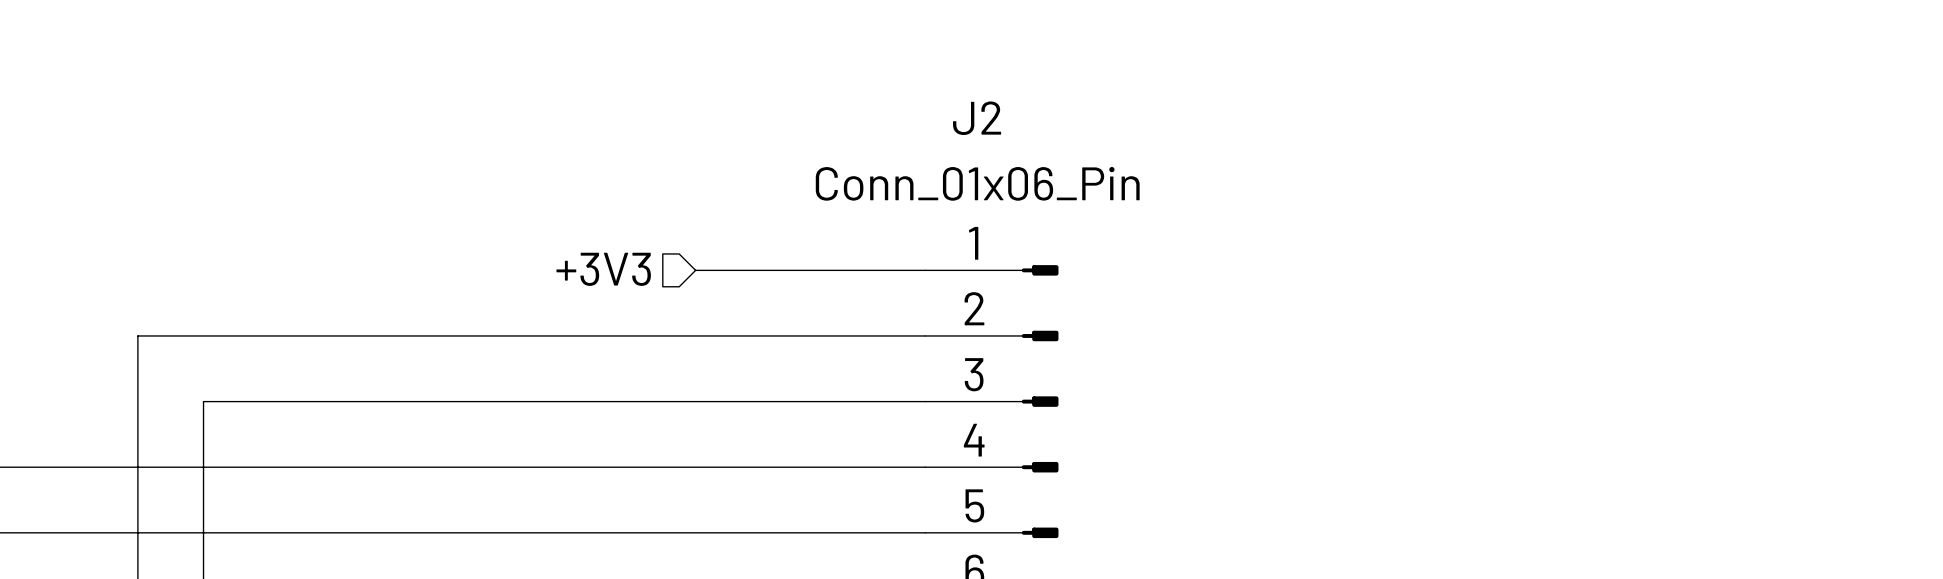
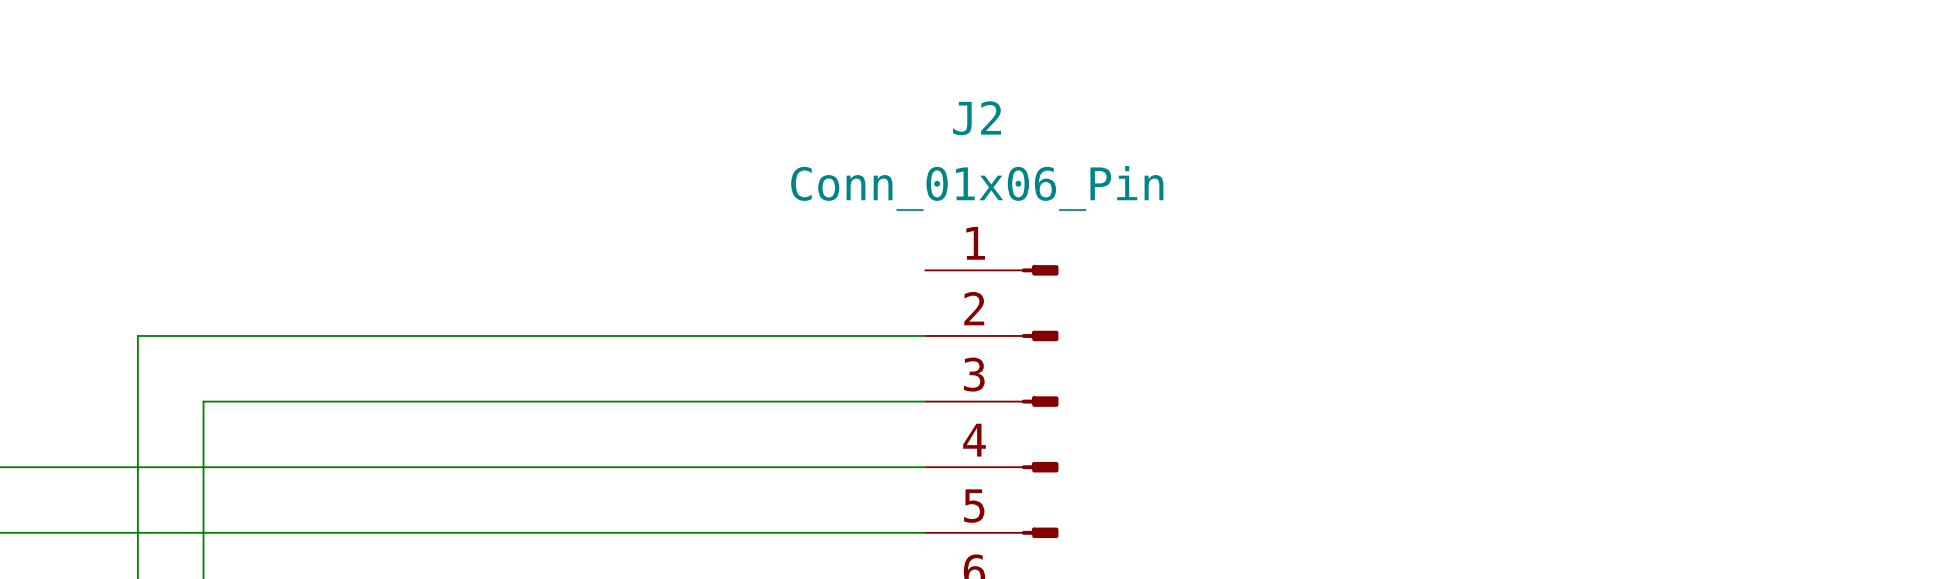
hierarchical label: +3V3 (603, 269) -> none
wire: (695, 270) (925, 270) -> none

